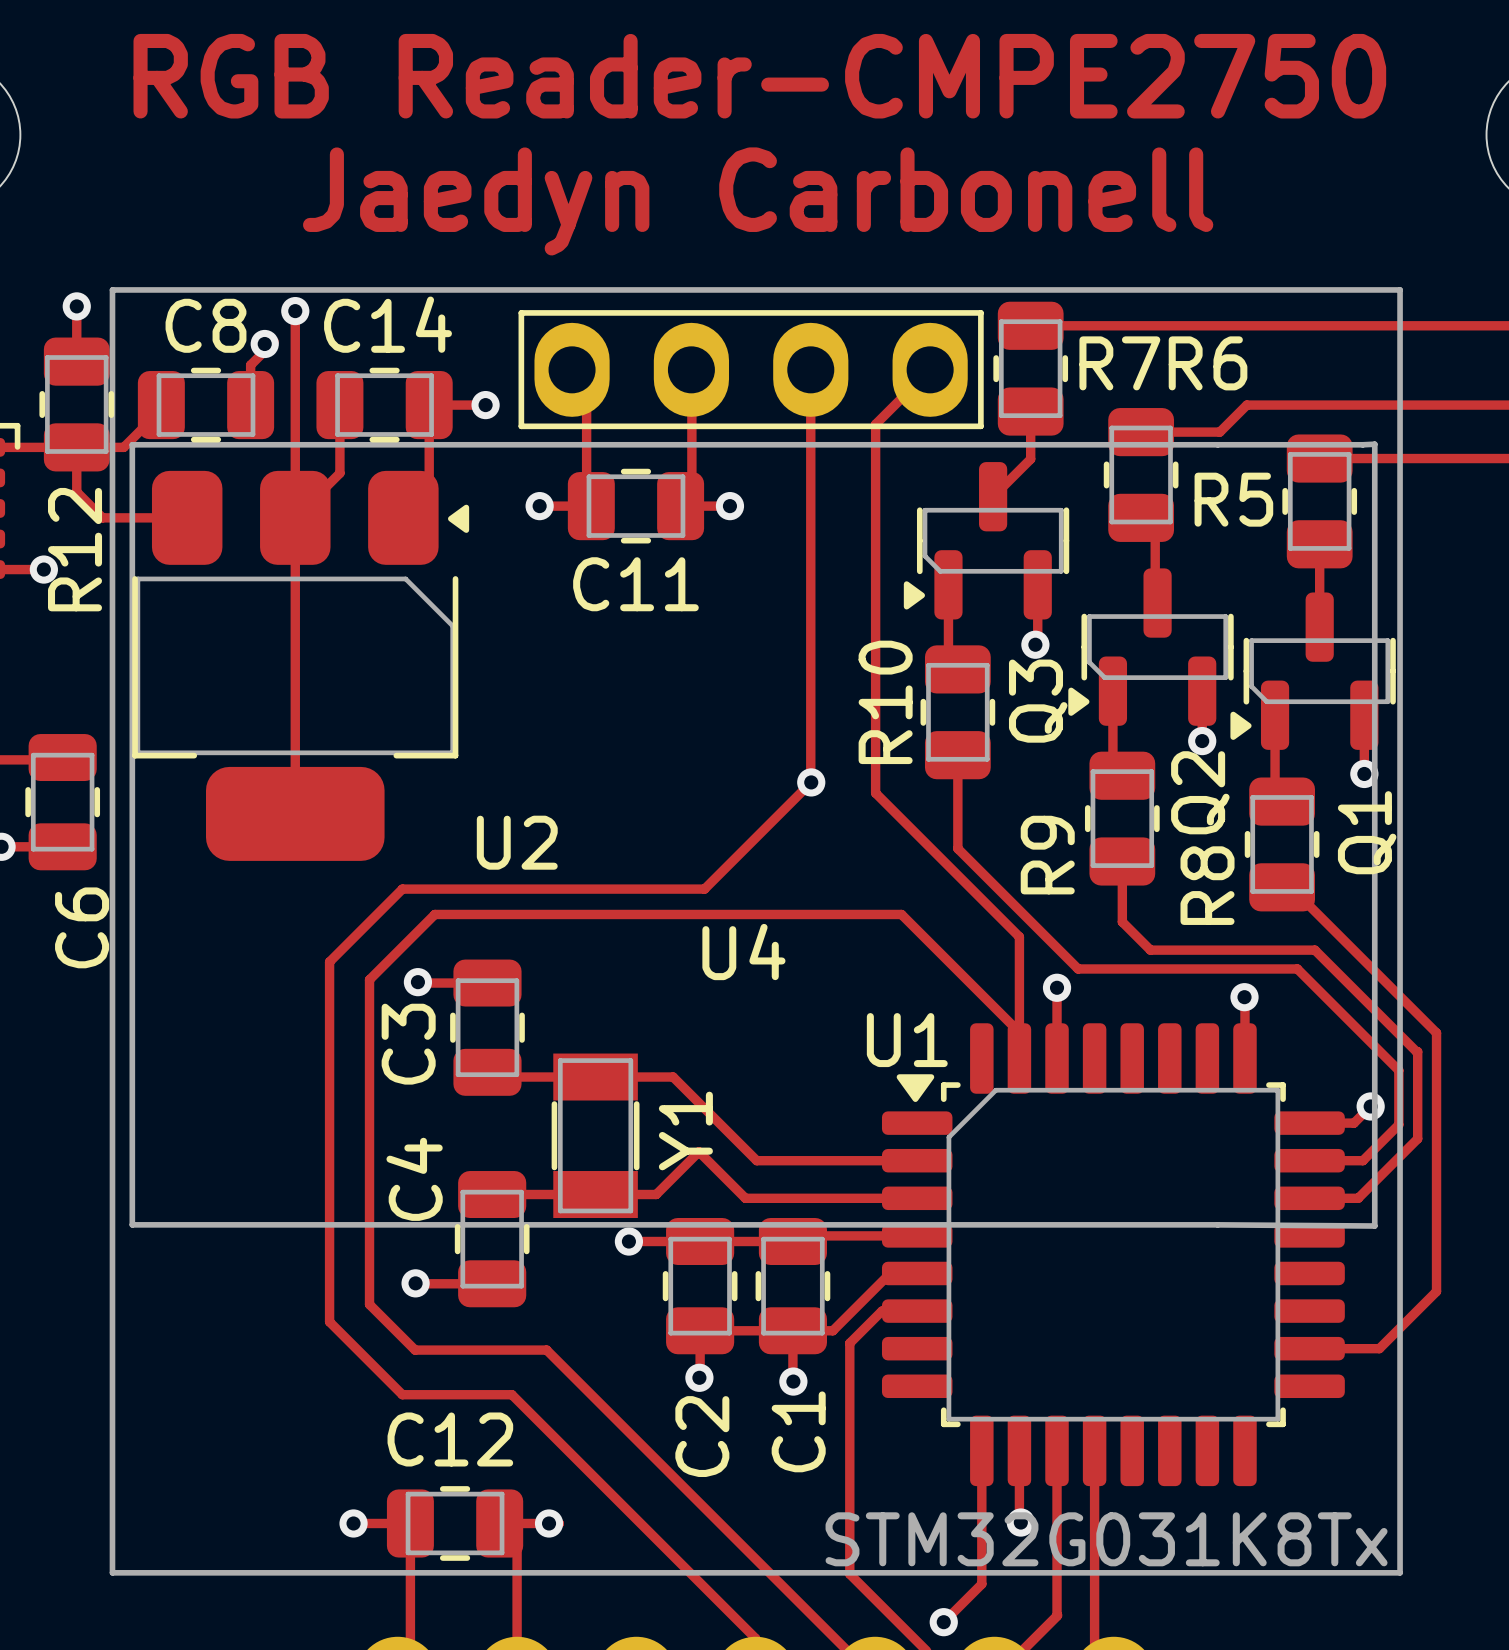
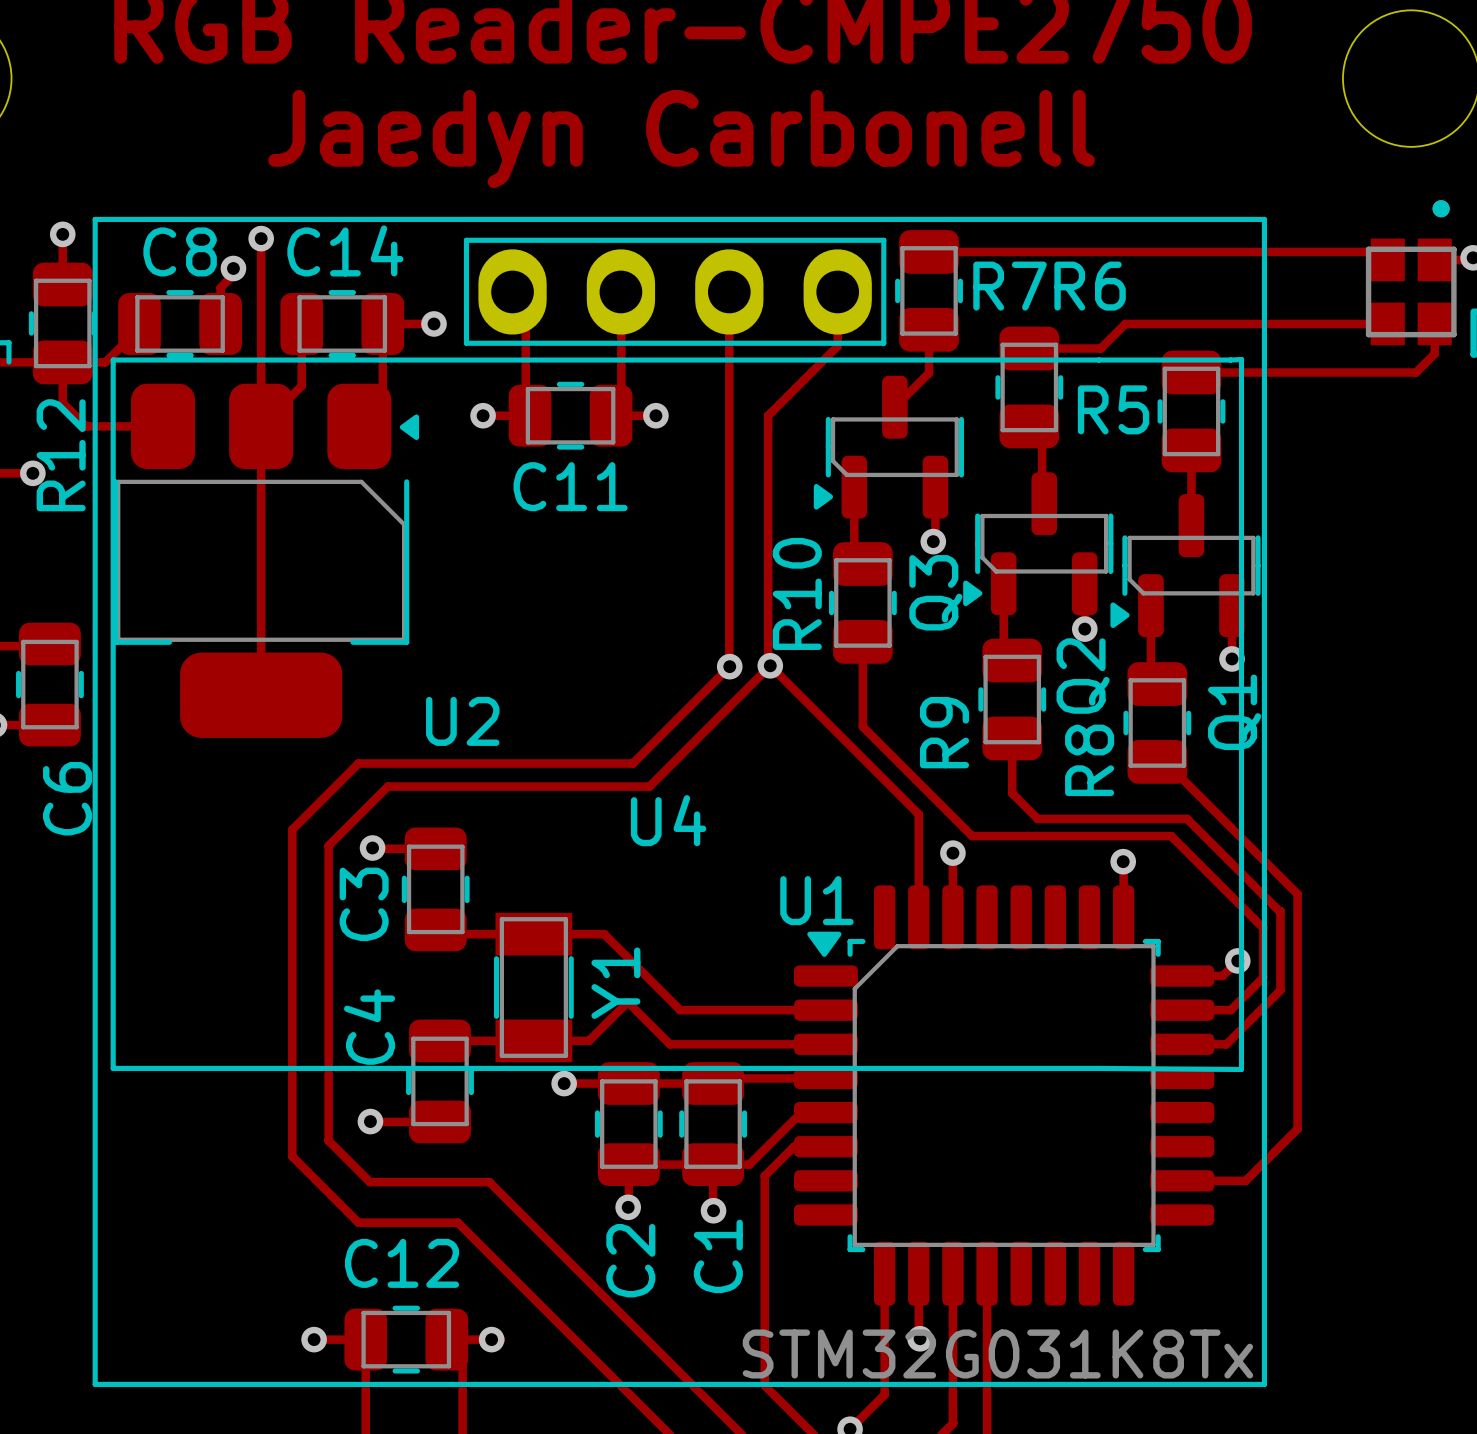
U4 footprint: [109, 287, 1403, 1576] -> [92, 216, 1268, 1387]
track: (930, 369) (875, 424) (875, 793) (1019, 936) (1019, 945) -> (837, 291) (837, 346) (768, 415) (768, 663) (918, 814)
via: none -> (770, 665)
track: (722, 914) (901, 914) (1019, 1032) -> (649, 786) (770, 665)

